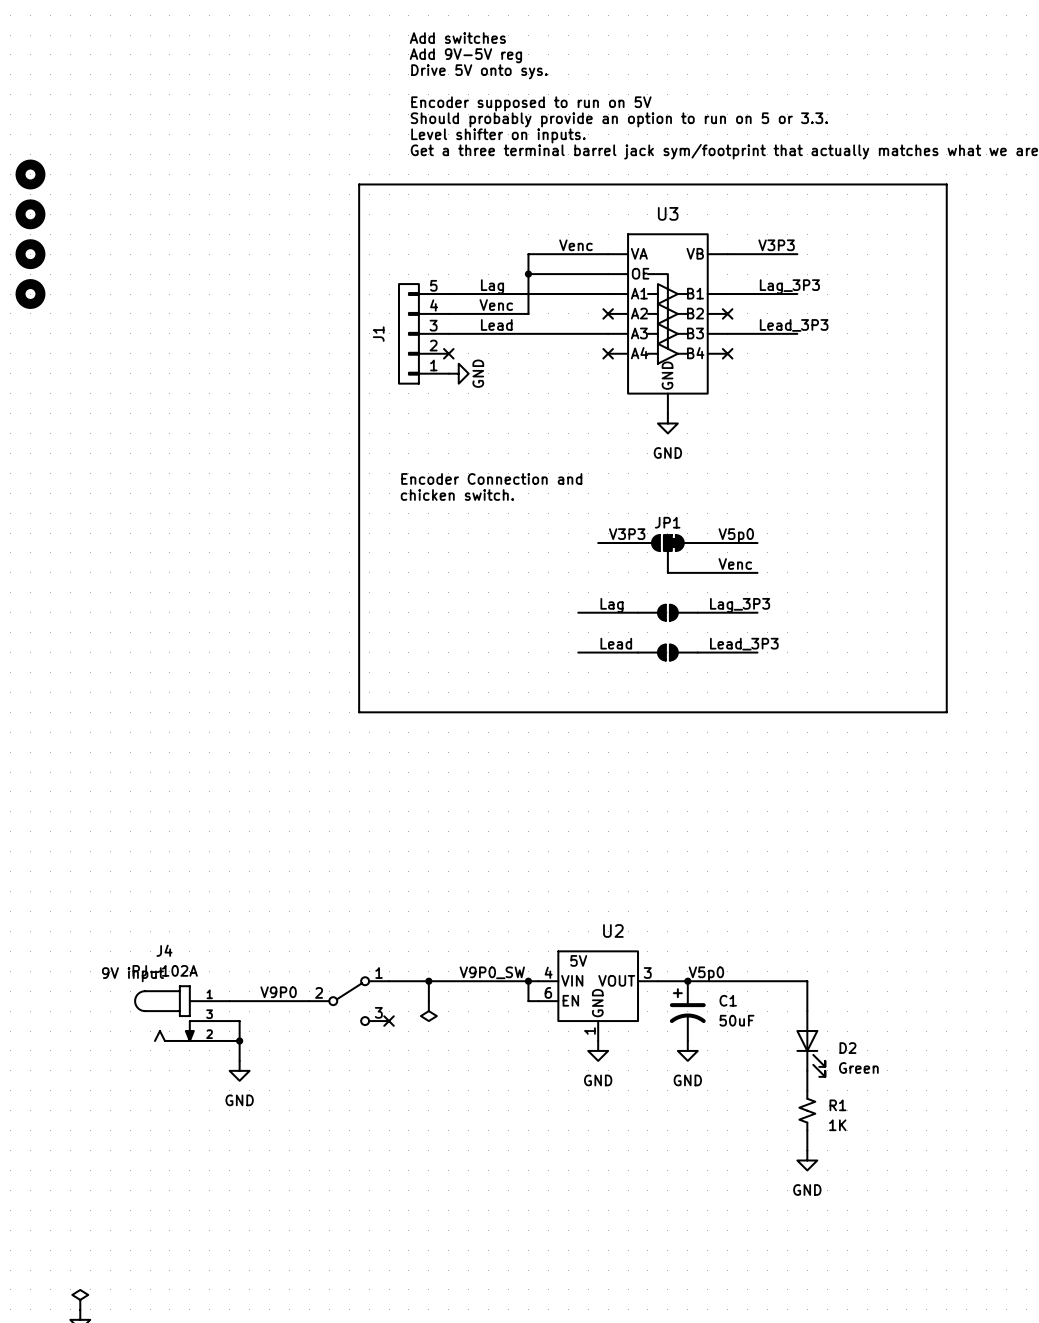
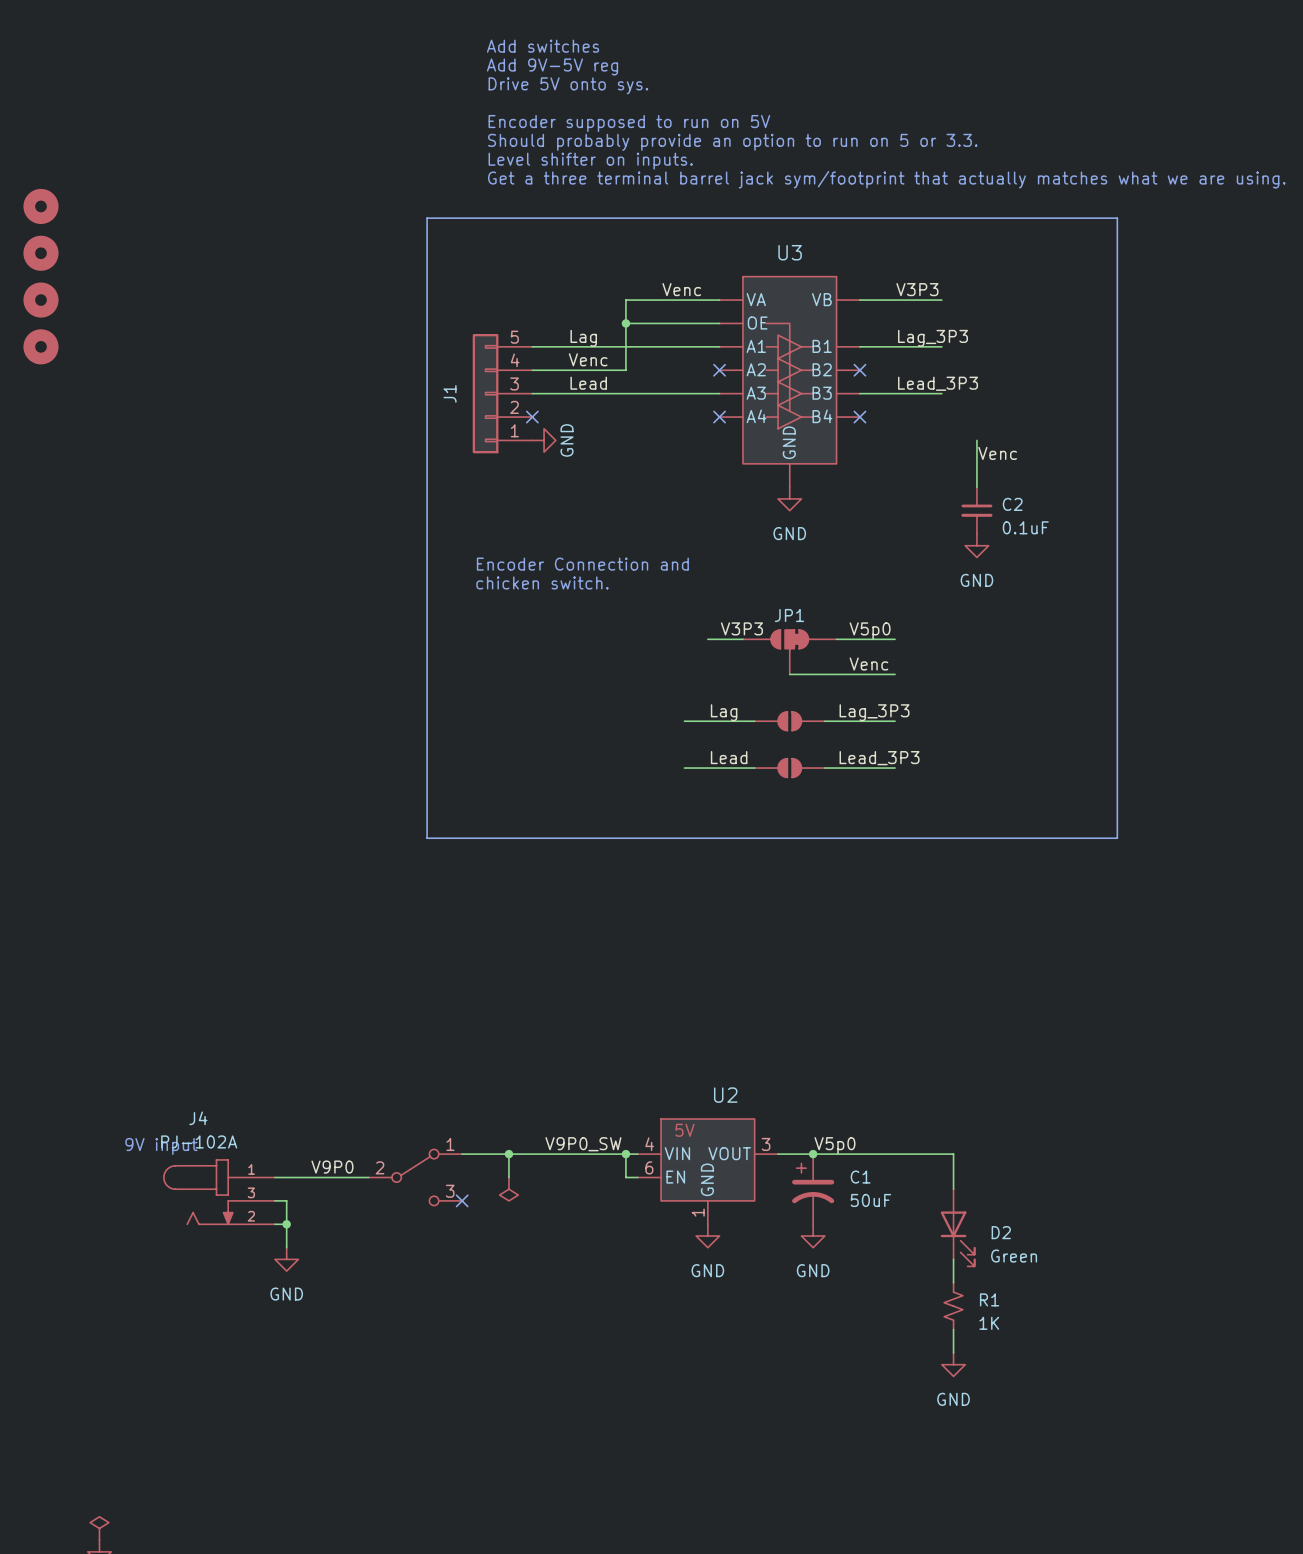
wire: none -> (976, 440) (976, 487)
label: none -> Venc (997, 453)
C2: none -> 0.1uF (976, 510)
power symbol: none -> GND (976, 545)

